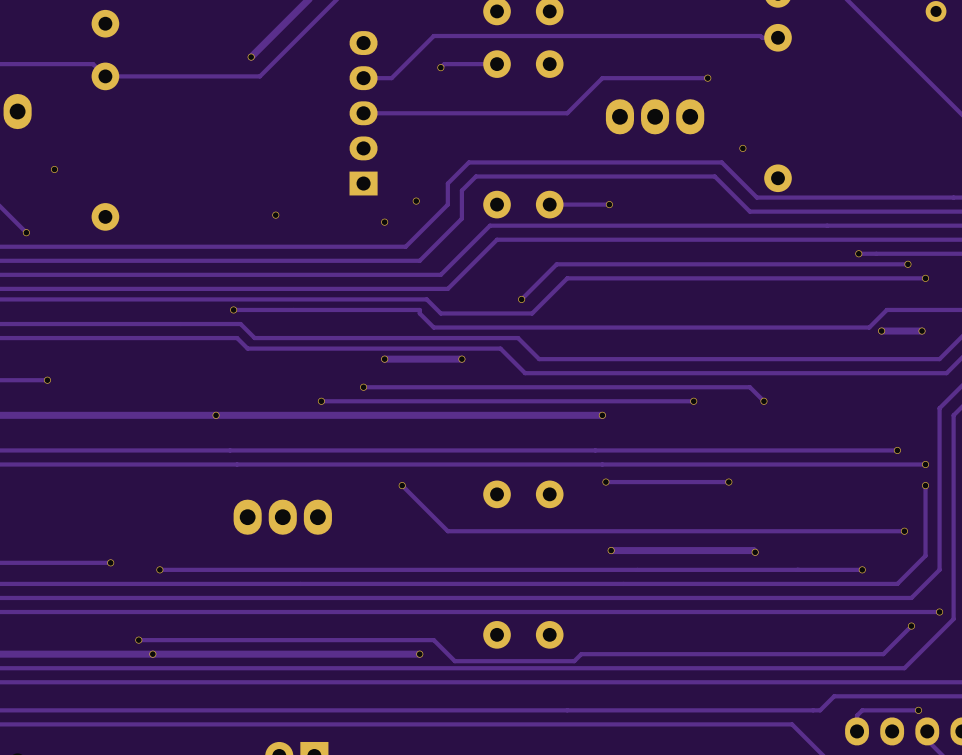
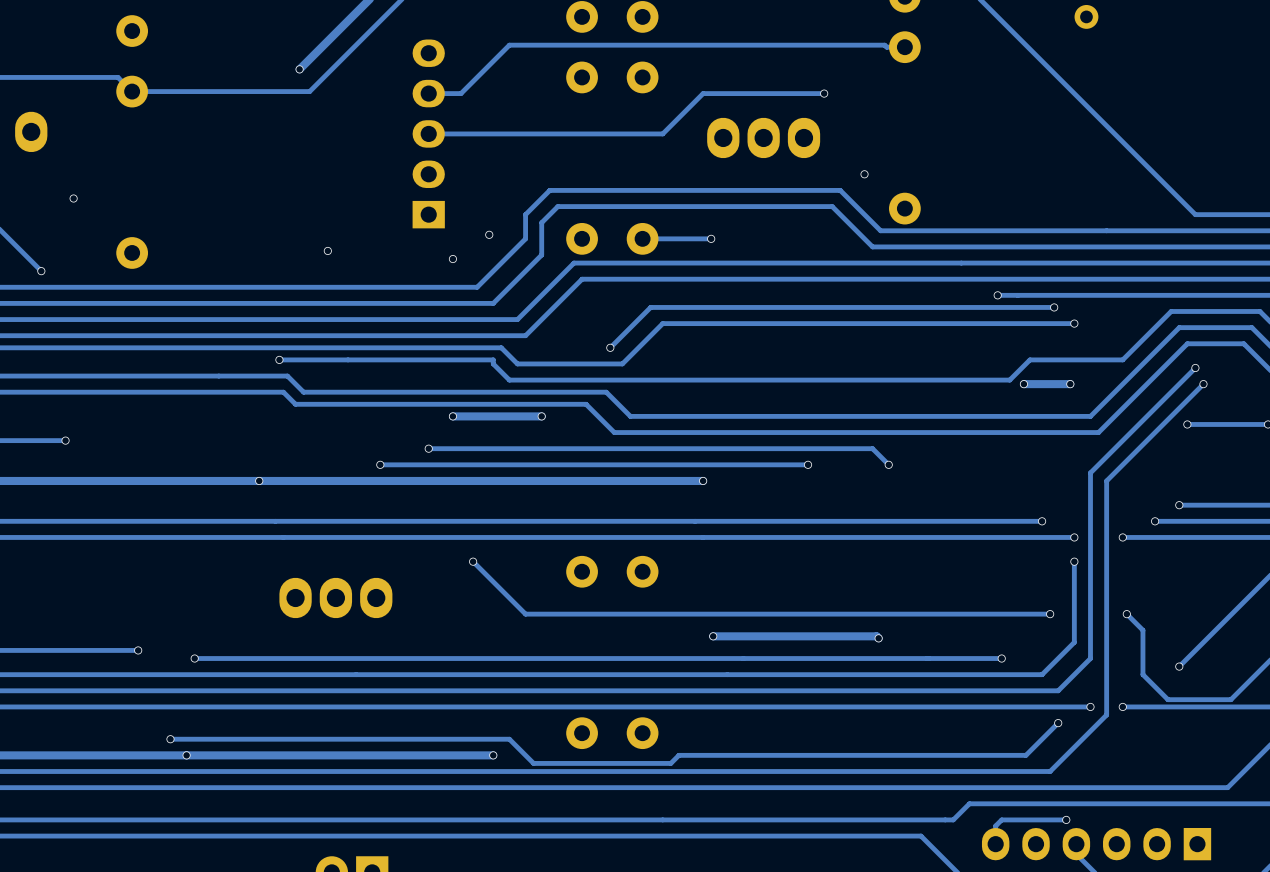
track: (497, 64) (444, 64) (440, 67) -> none
via: (440, 67) -> none
via: (605, 482) -> none
track: (728, 482) (605, 482) -> none
via: (728, 482) -> none

